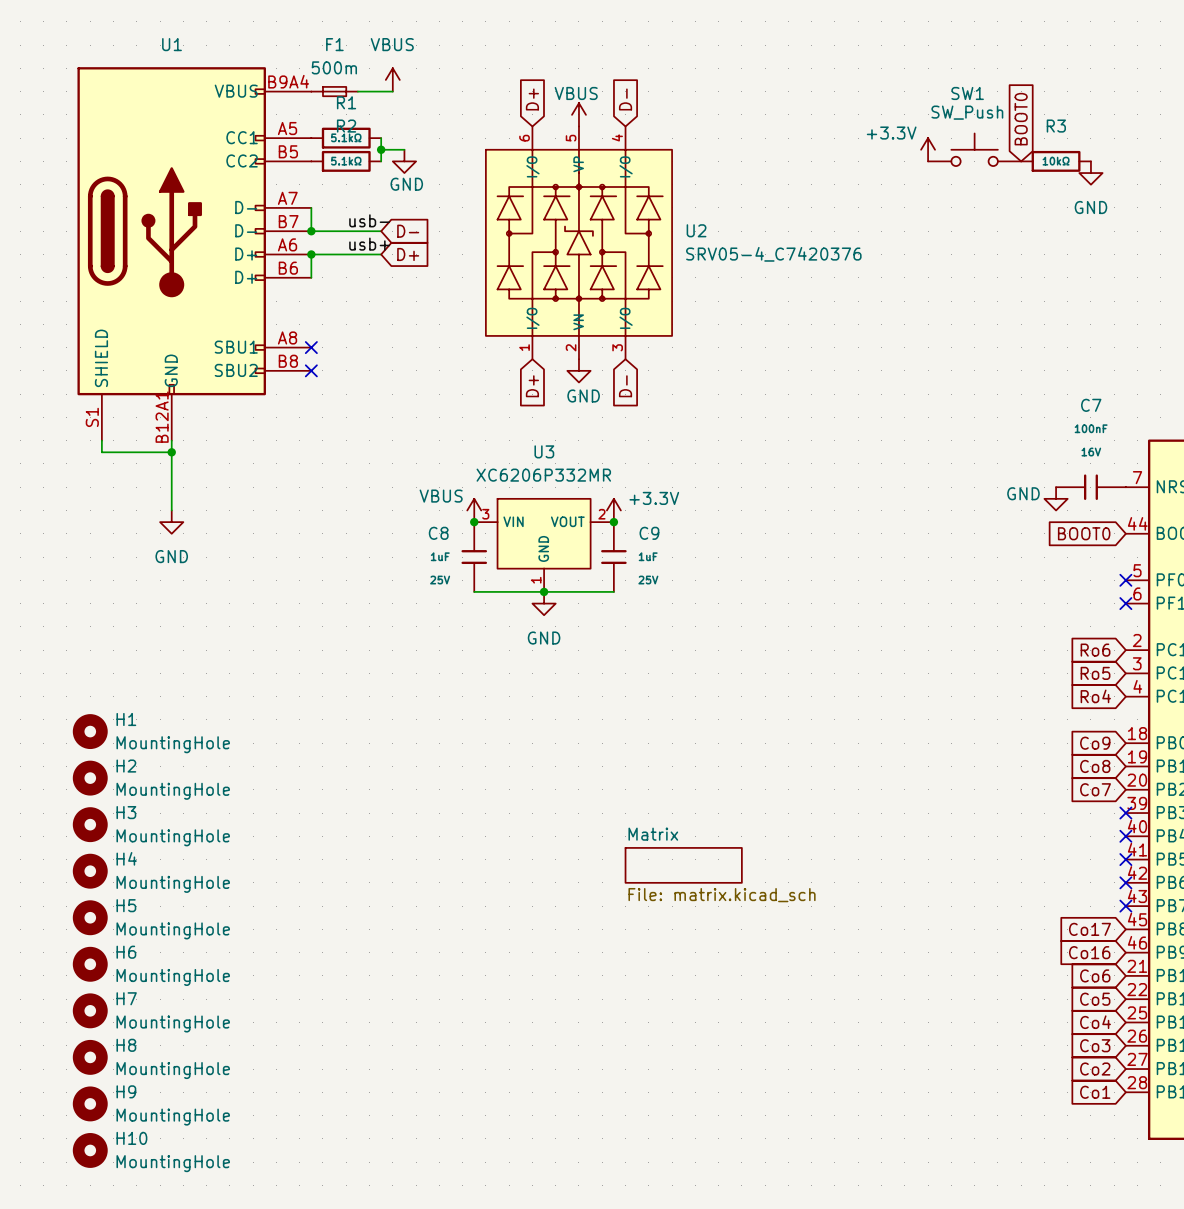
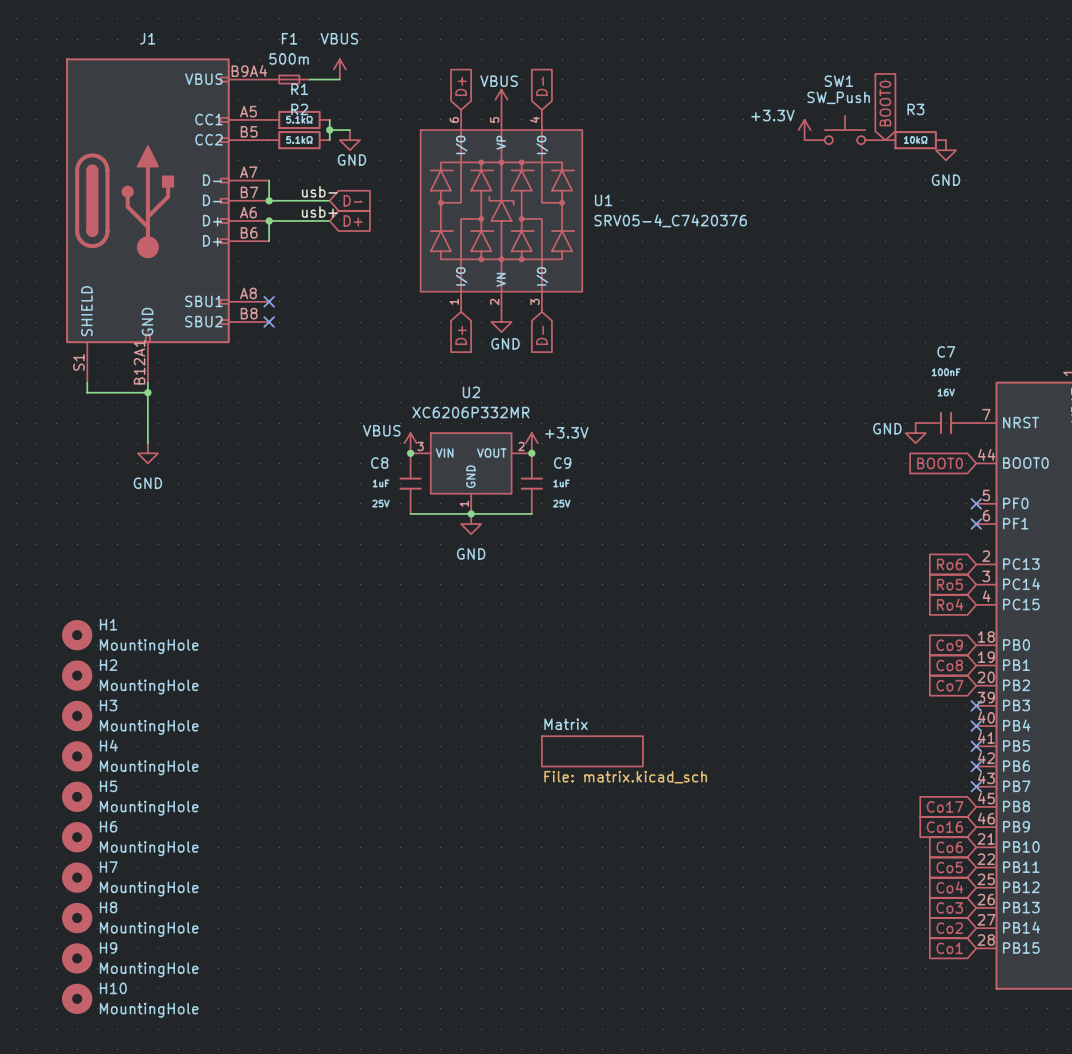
U1 name: U1 (171, 44) -> J1 (147, 38)
U2 name: U2 (696, 230) -> U1 (603, 200)
U3 name: U3 (544, 451) -> U2 (471, 392)

